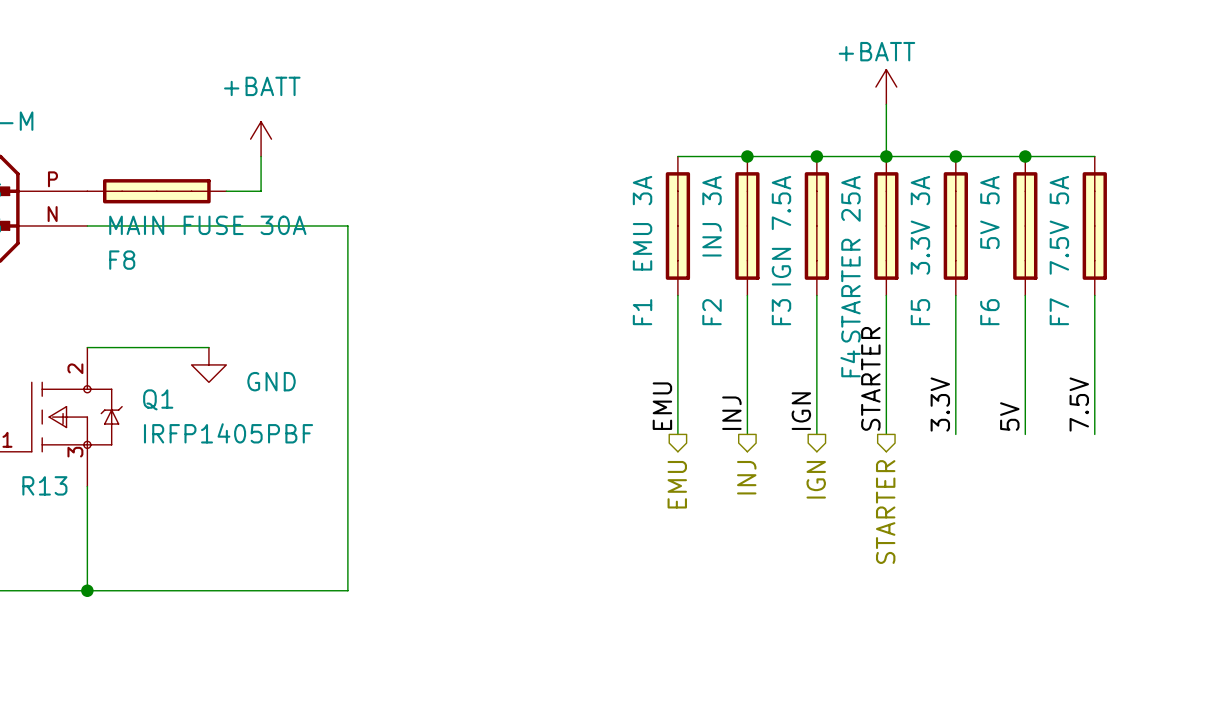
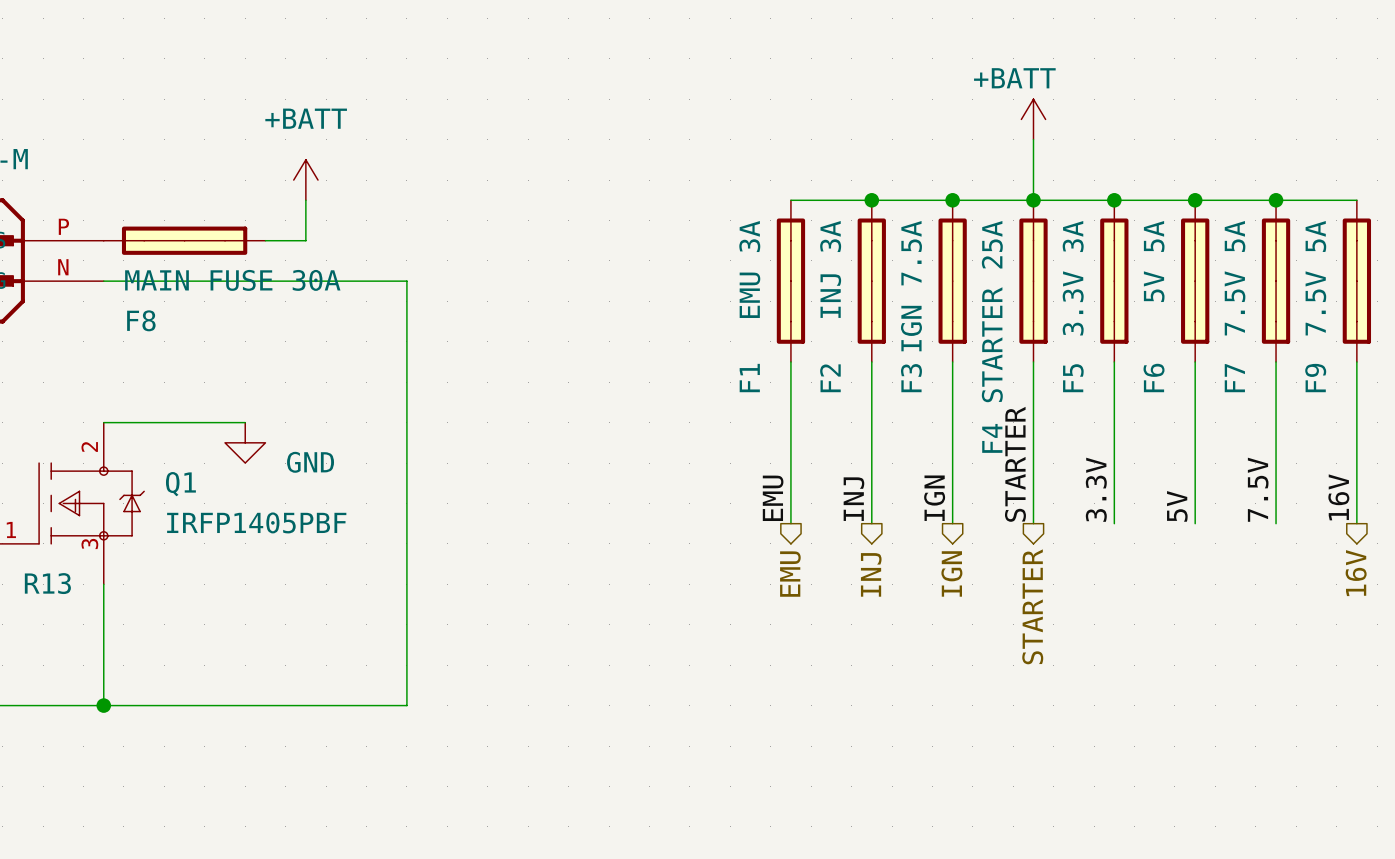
wire: none -> (1276, 200) (1356, 200)
junction: none -> (1276, 200)
F9: none -> 7.5V 5A (1356, 281)
wire: none -> (1356, 361) (1356, 523)
label: none -> 16V (1338, 497)
hierarchical label: none -> 16V (1356, 573)

